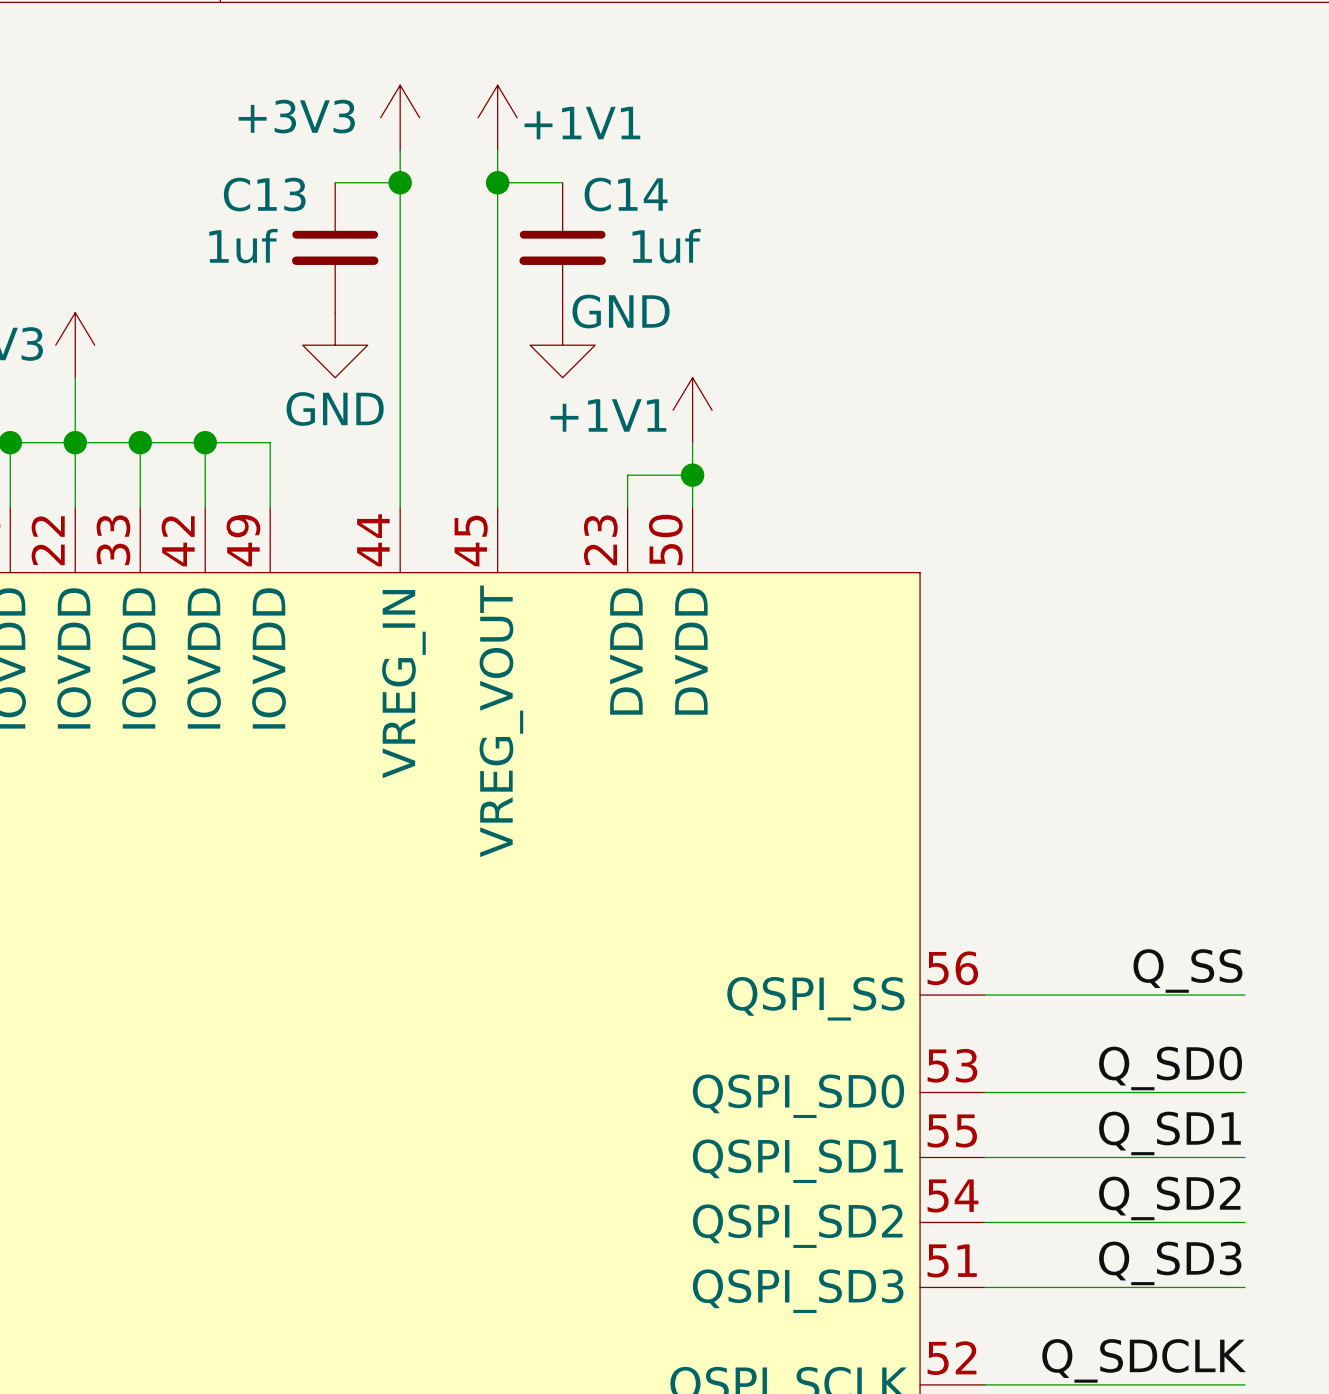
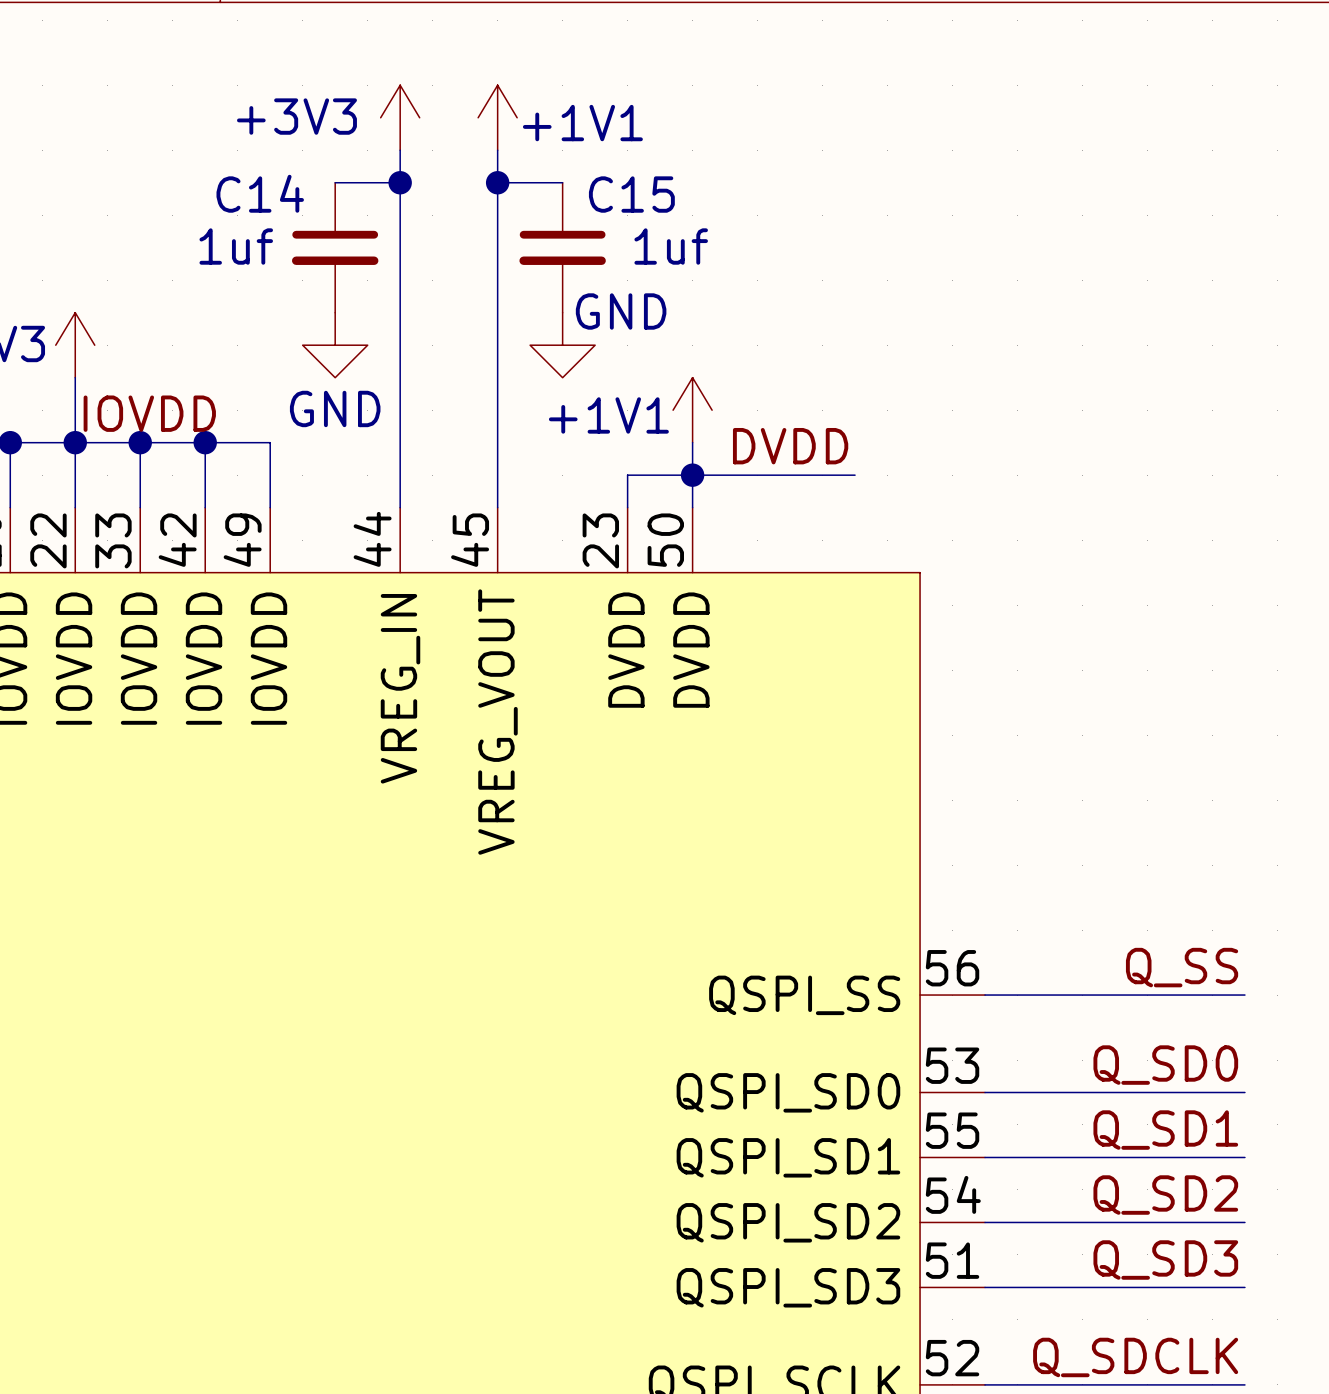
C13 name: C13 (264, 194) -> C14 (260, 193)
C14 name: C14 (626, 194) -> C15 (631, 194)
label: none -> IOVDD (149, 413)
label: none -> DVDD (790, 446)
wire: none -> (692, 475) (855, 475)

